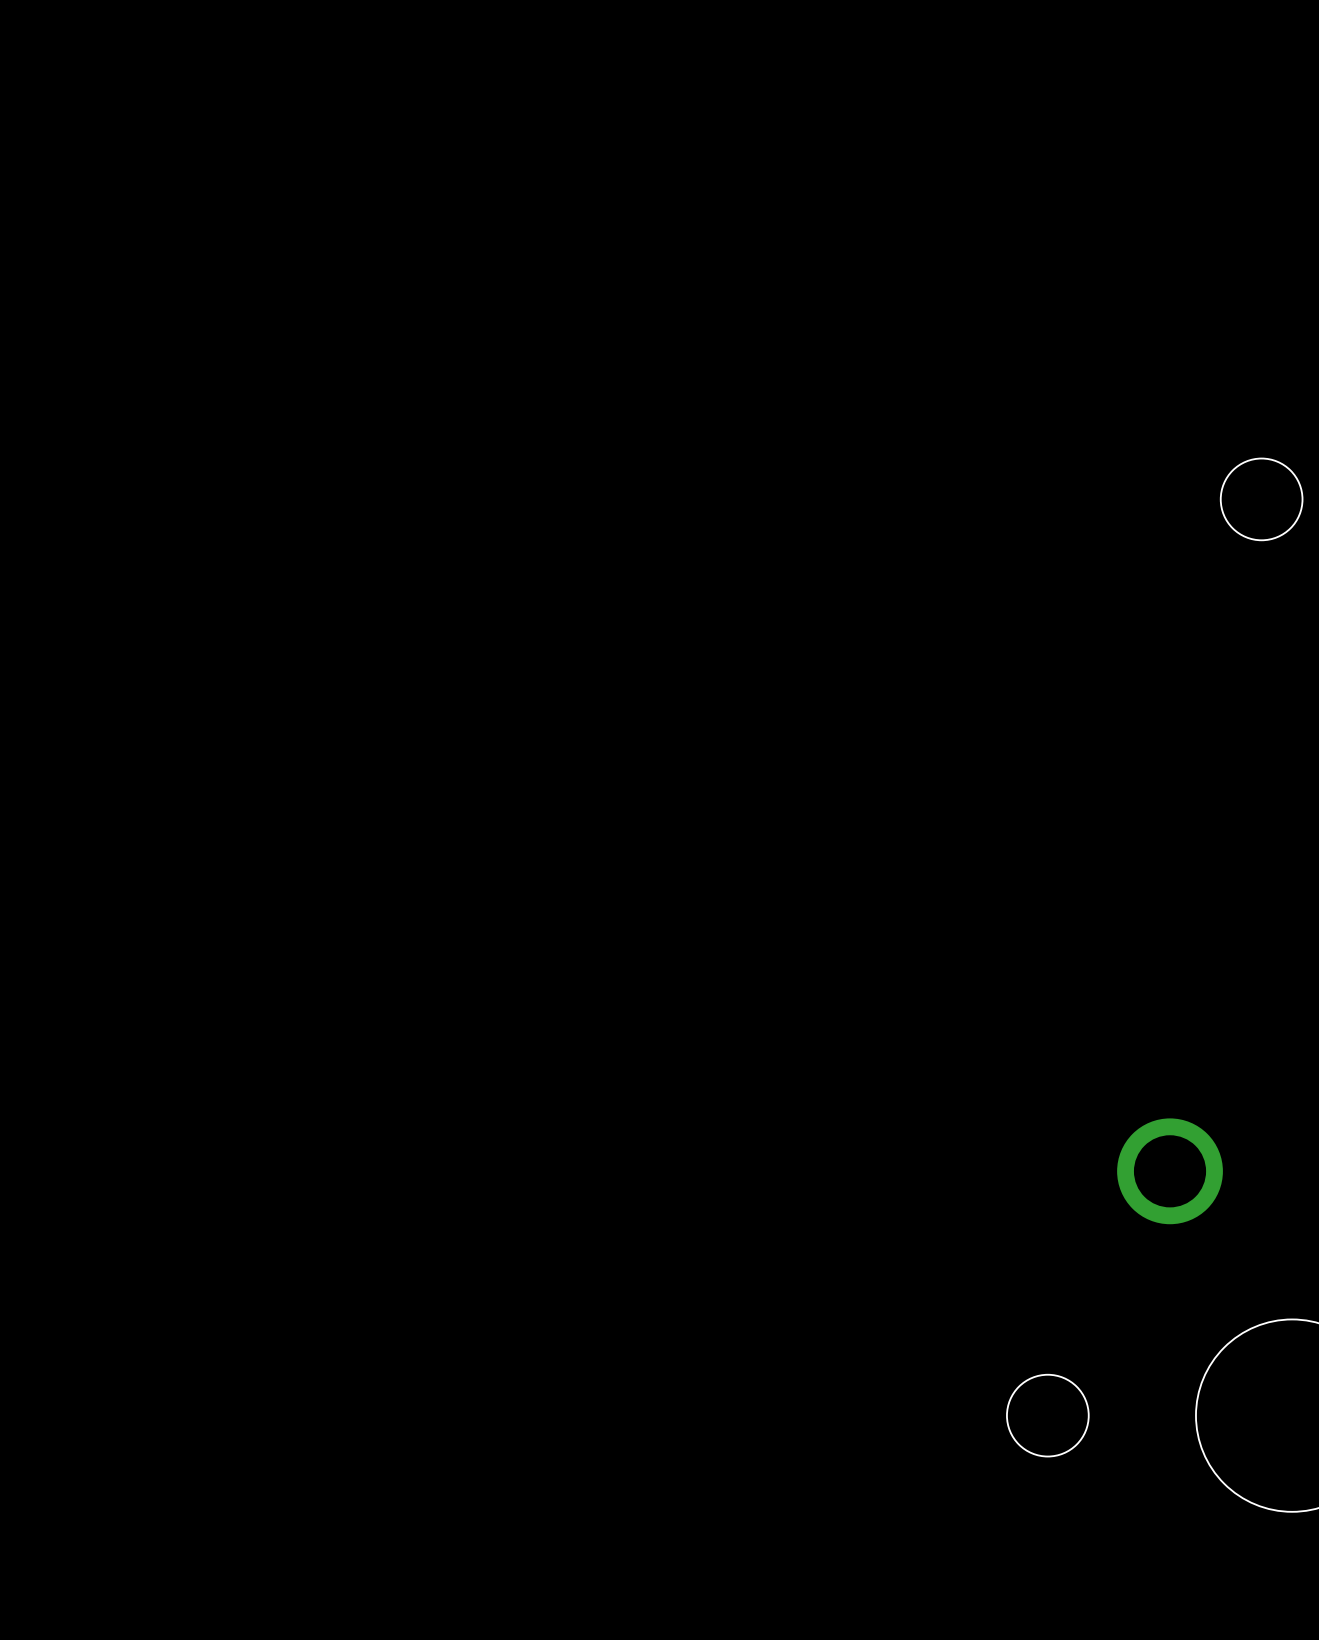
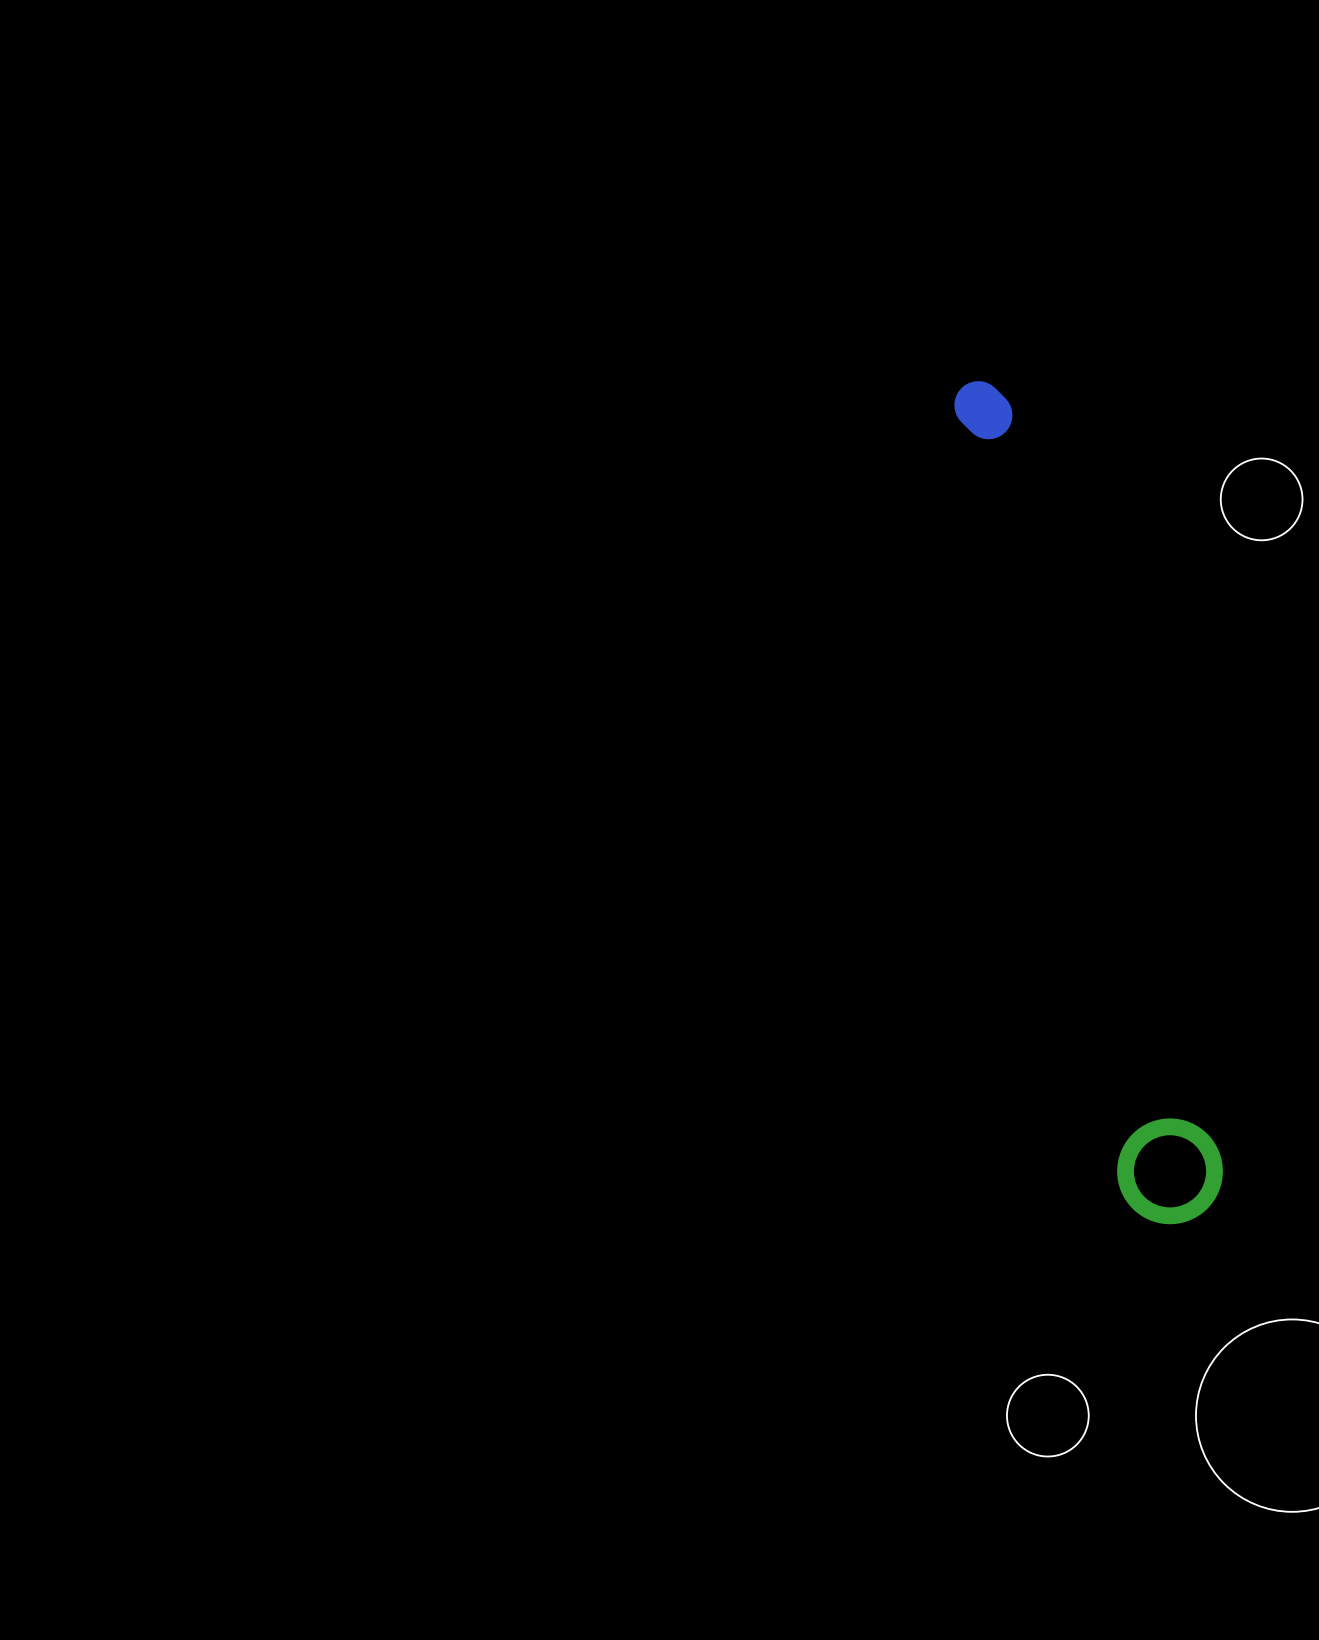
track: none -> (978, 405) (988, 415)

